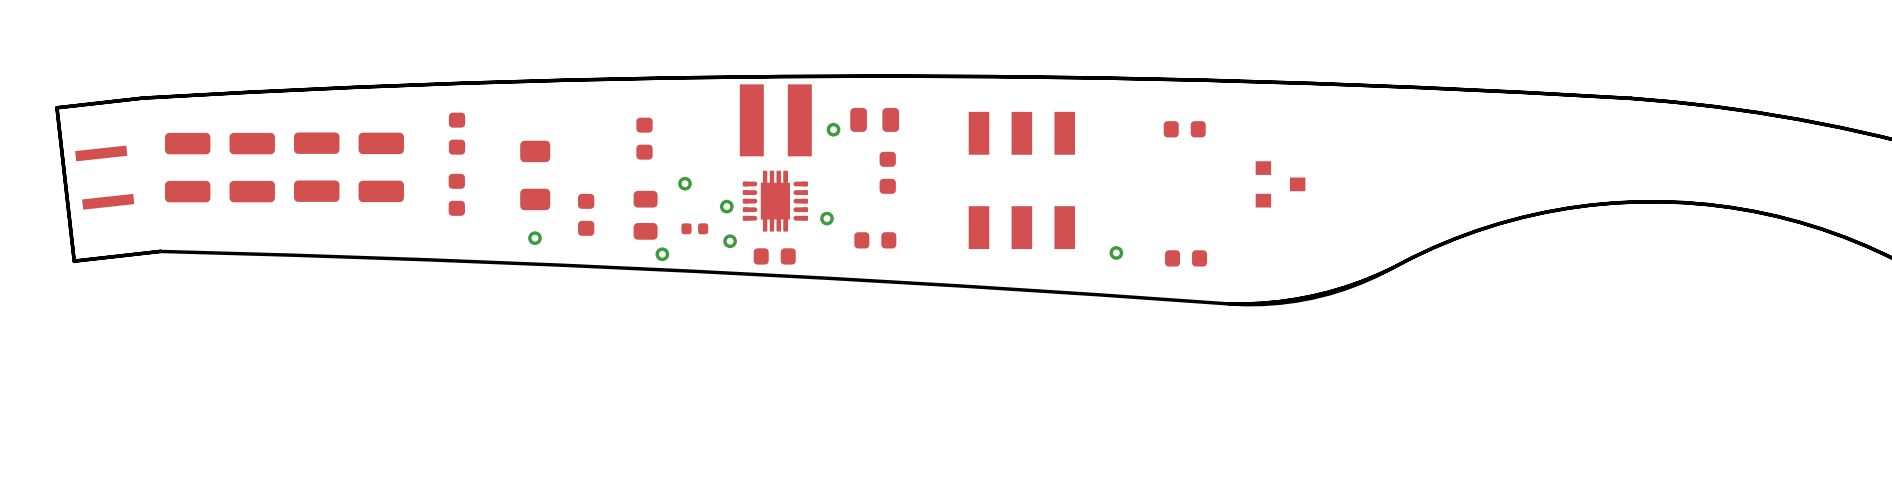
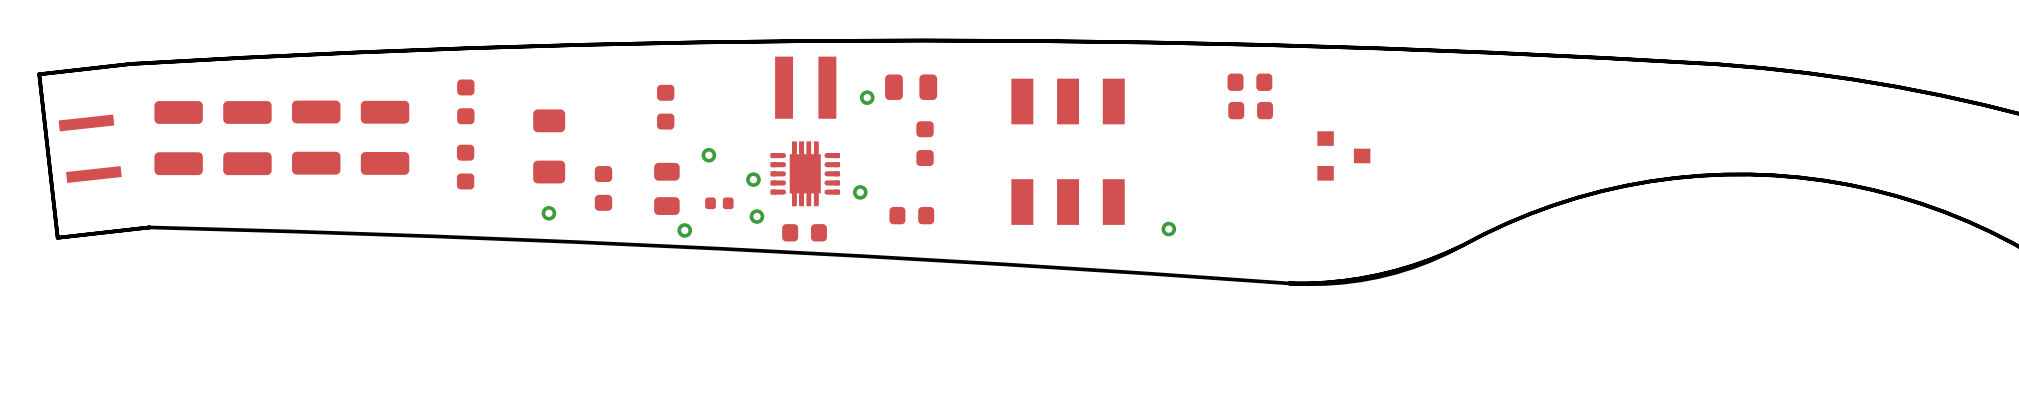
part footprint: [739, 84, 812, 157] -> [775, 56, 837, 119]
part: none -> (1249, 82)
part: (1184, 129) -> none
part: none -> (1250, 110)
part: (1186, 258) -> none

